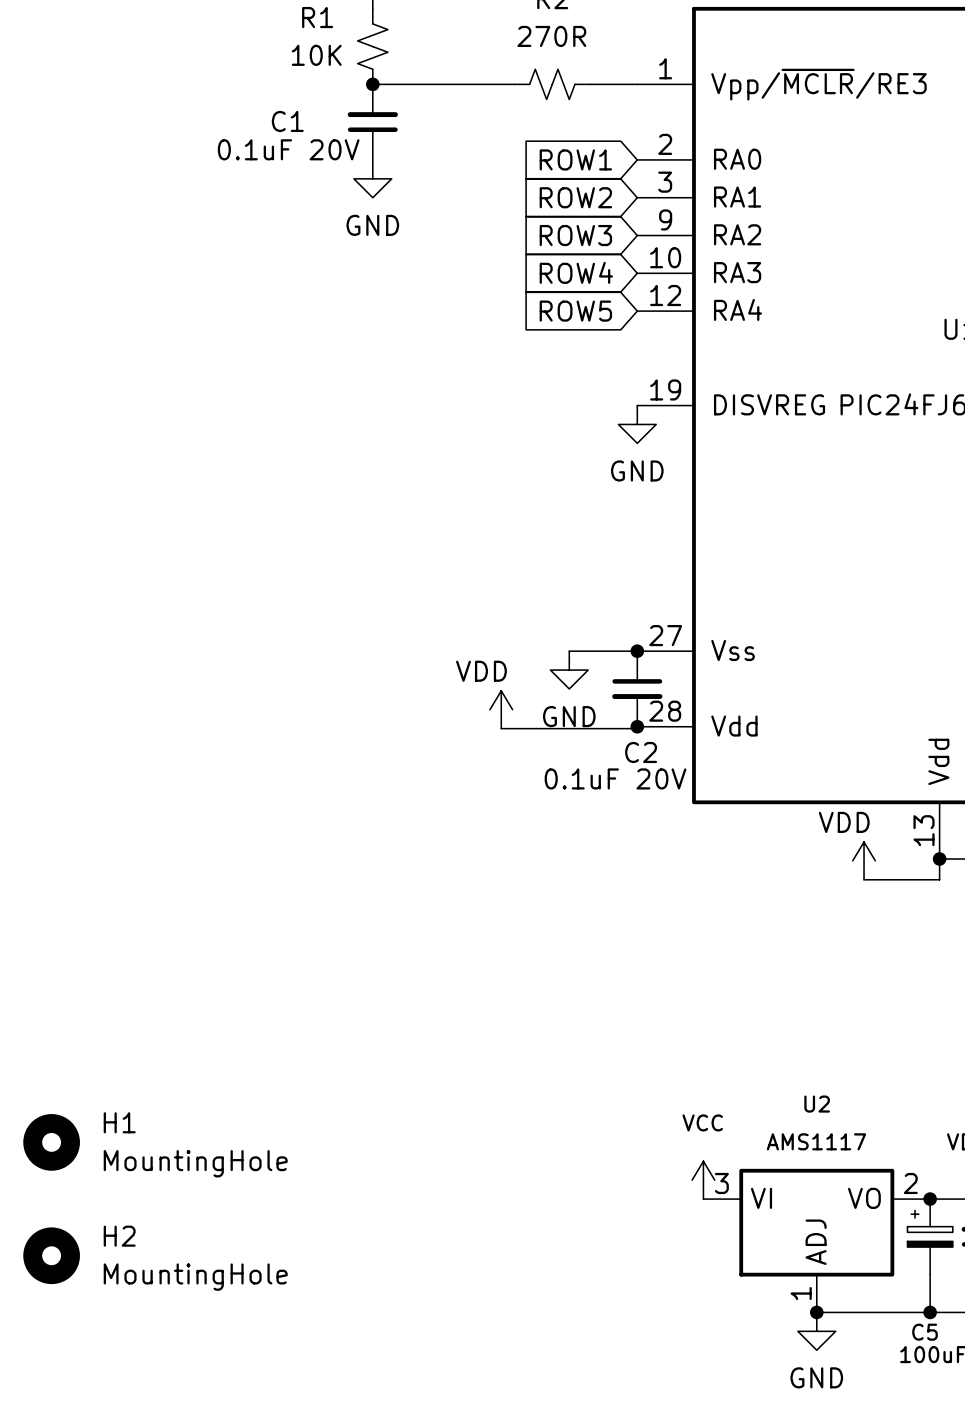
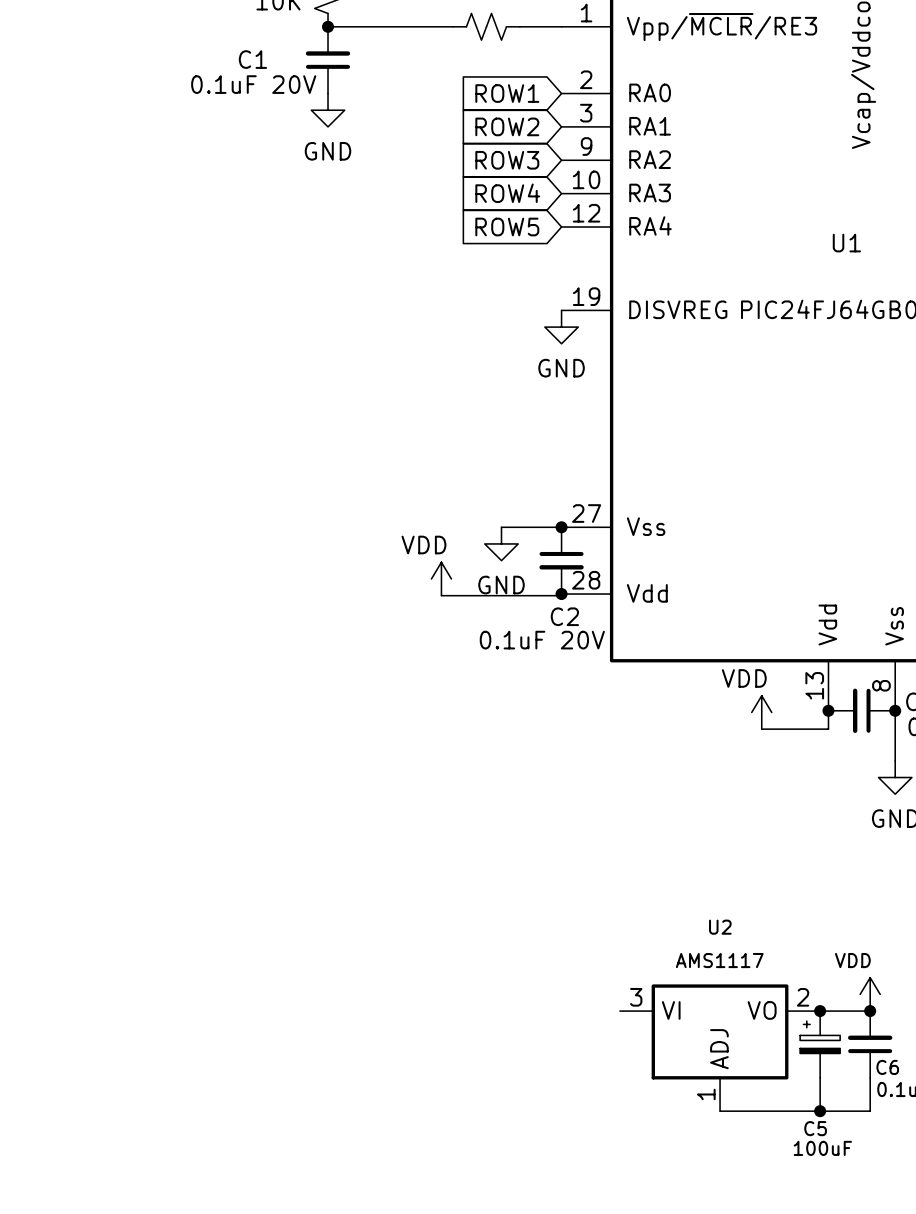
H1: MountingHole (51, 1142) -> none
power symbol: VCC (703, 1180) -> none
H2: MountingHole (51, 1255) -> none
junction: (816, 1312) -> none
power symbol: GND (816, 1331) -> none

